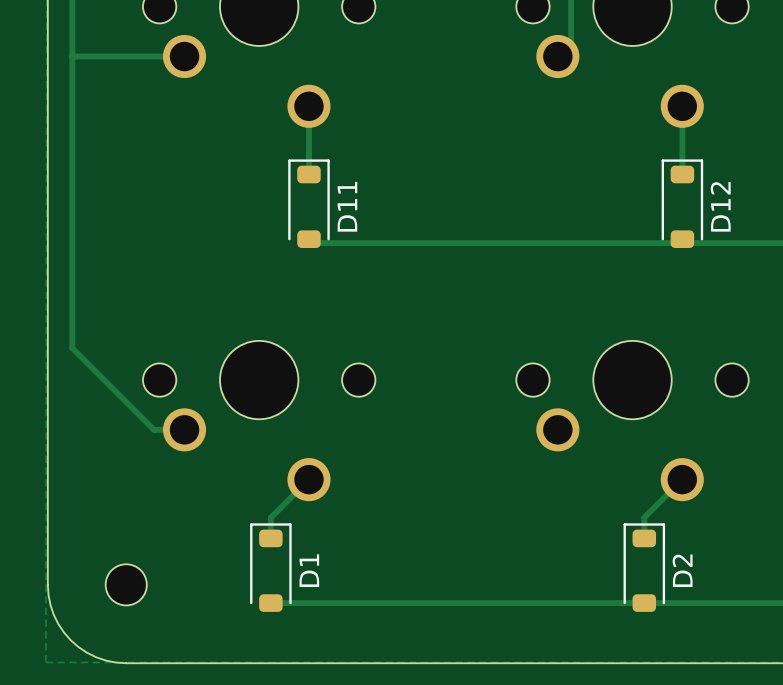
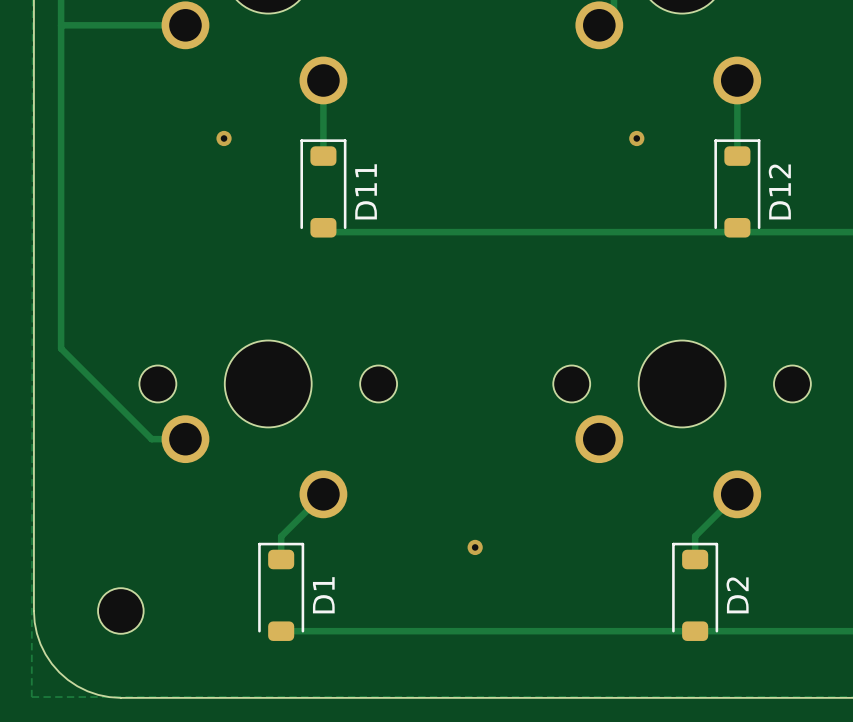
via: none -> (224, 138)
via: none -> (636, 138)
via: none -> (475, 547)

